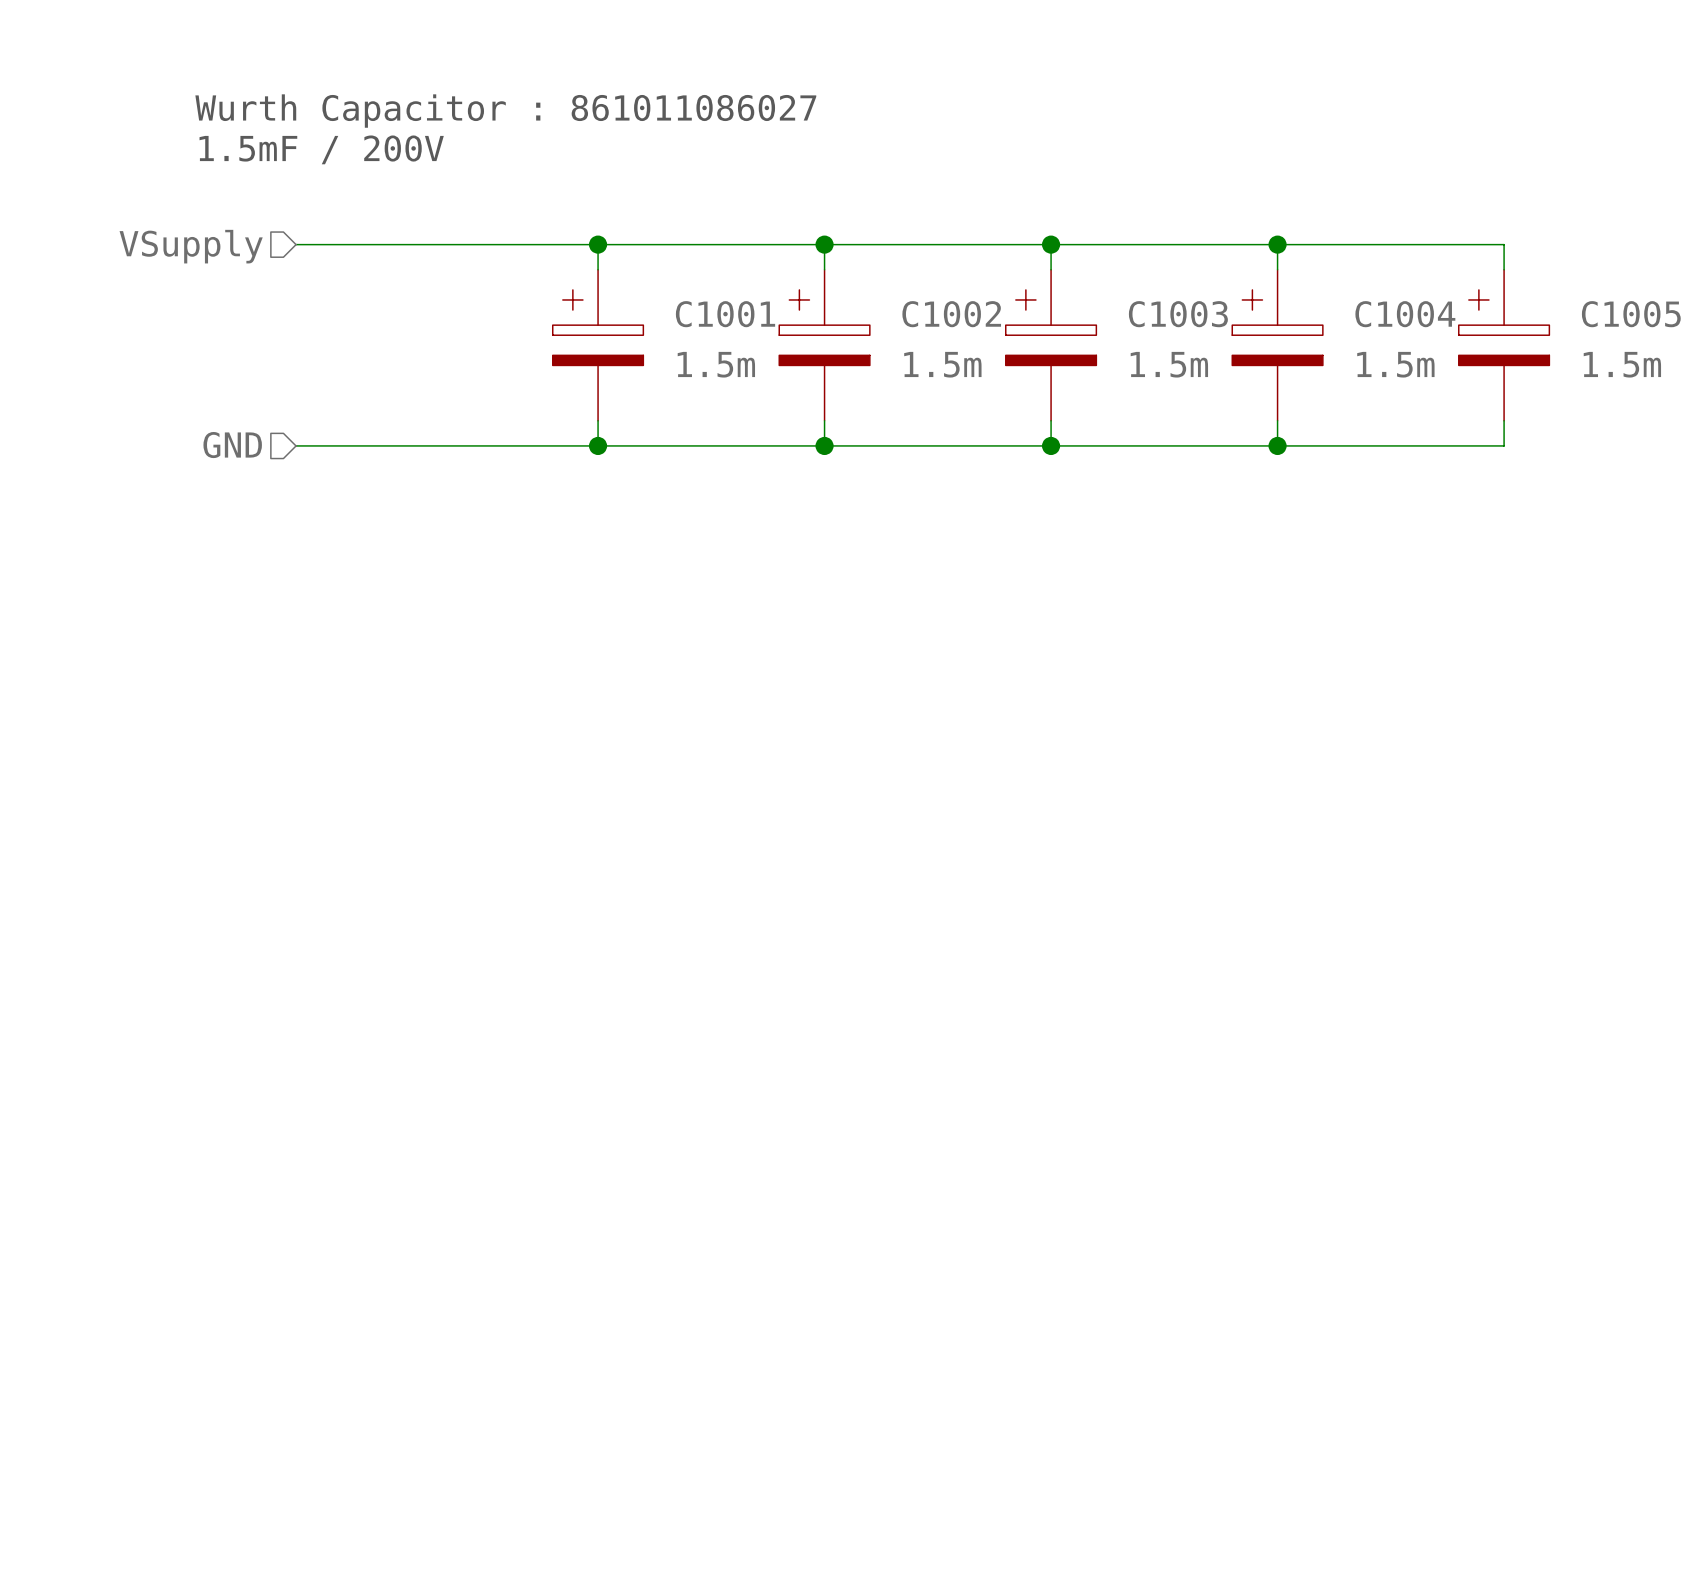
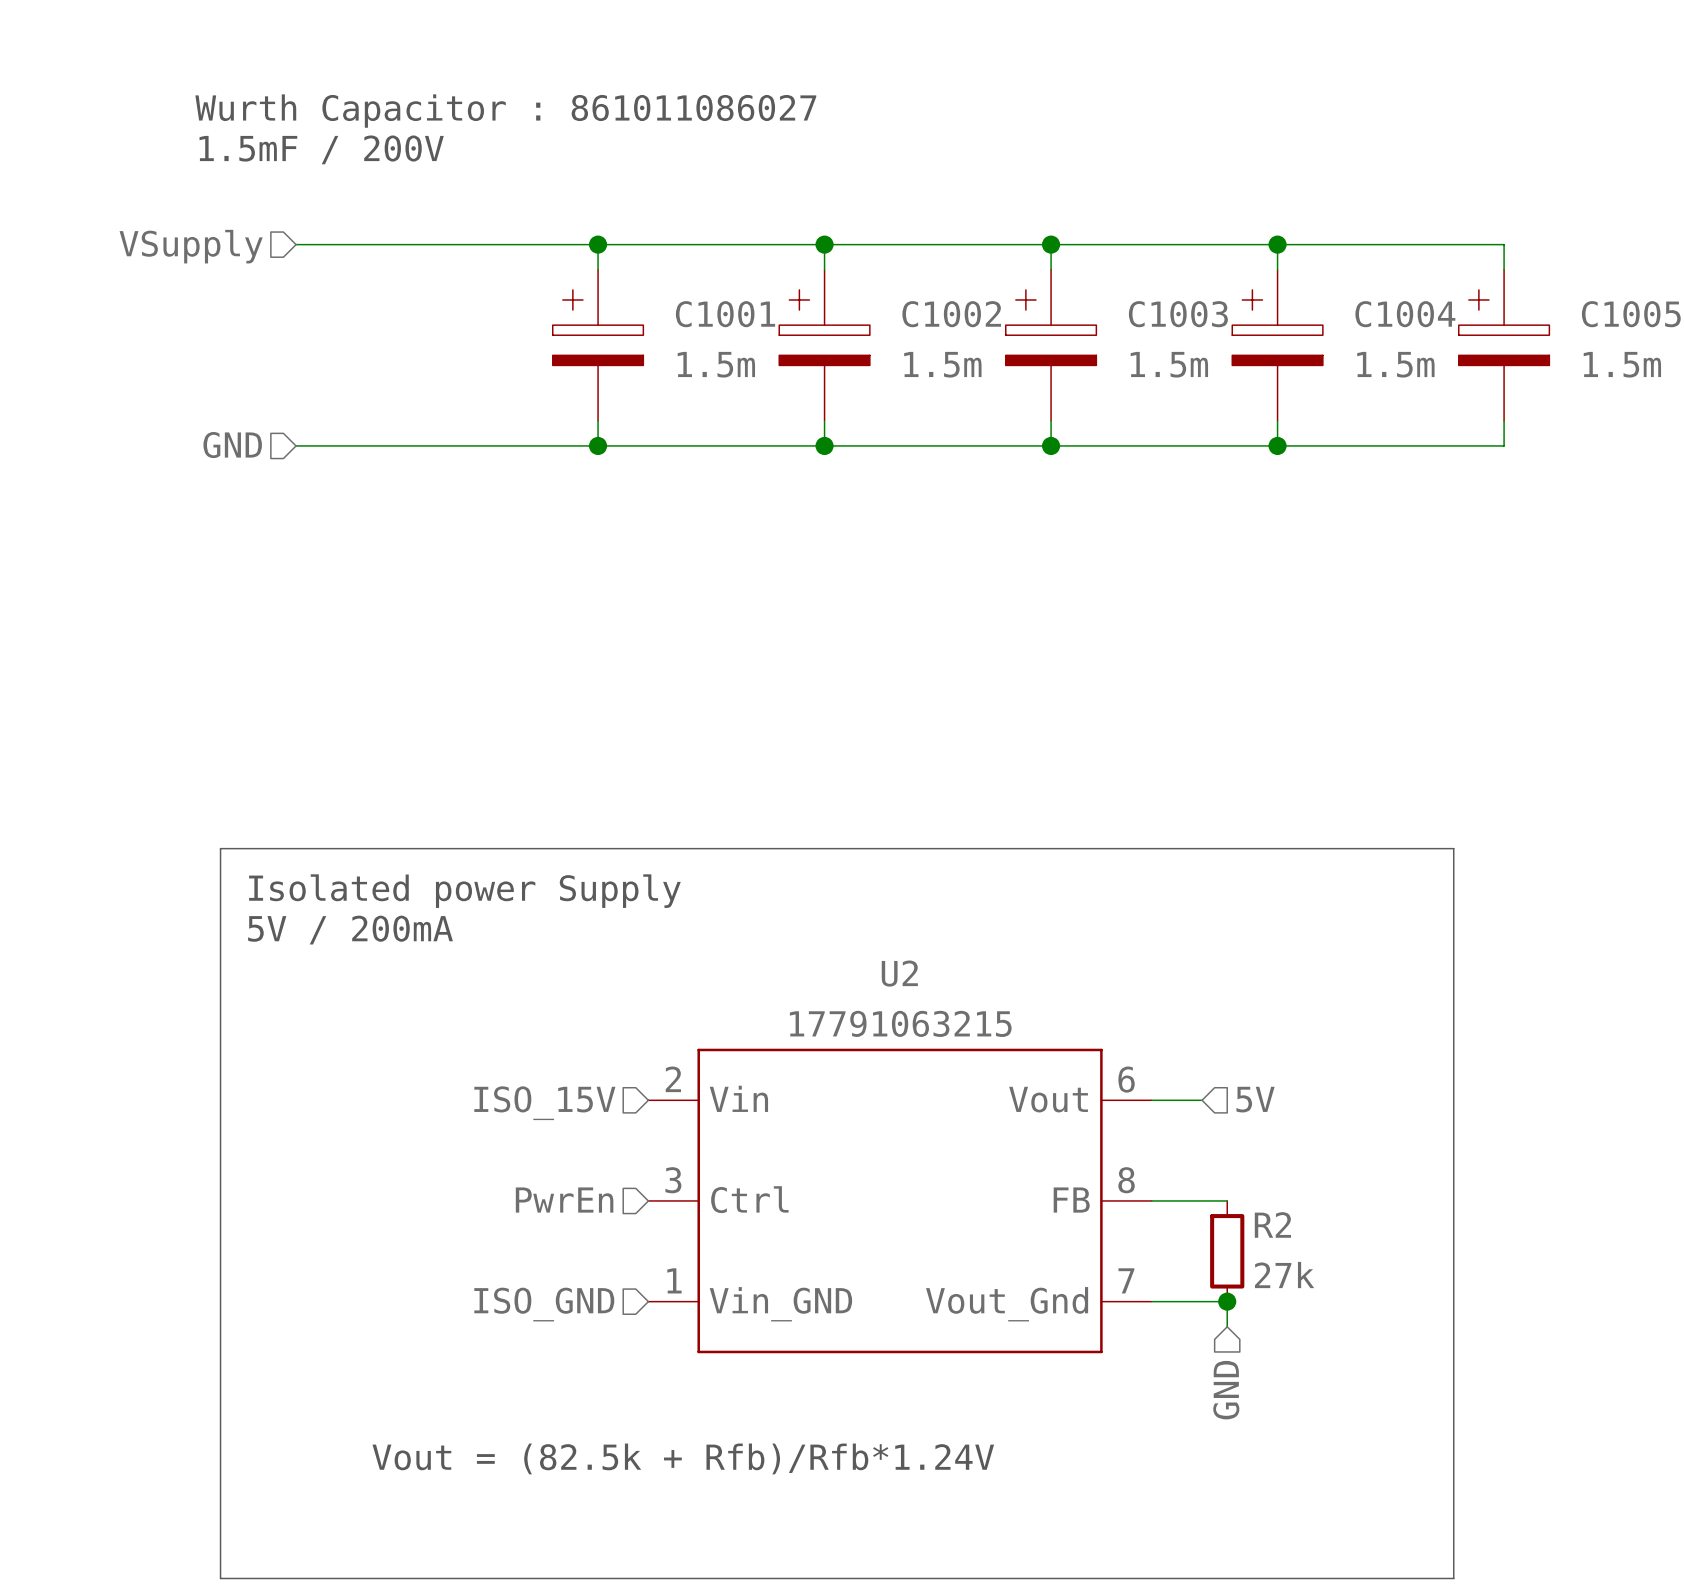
line: none -> (220, 848) (1453, 848) (1453, 1578) (220, 1578) (220, 848)
text: none -> Isolated power Supply (464, 891)
text: none -> 5V / 200mA (350, 930)
hierarchical label: none -> 5V (1255, 1099)
wire: none -> (1151, 1100) (1202, 1100)
hierarchical label: none -> ISO_15V (544, 1103)
hierarchical label: none -> PwrEn (564, 1200)
U2: none -> 17791063215 (900, 1200)
wire: none -> (1151, 1200) (1227, 1200)
R2: none -> 27k (1227, 1251)
wire: none -> (1151, 1301) (1227, 1301) (1227, 1326)
junction: none -> (1227, 1301)
hierarchical label: none -> ISO_GND (544, 1304)
hierarchical label: none -> GND (1226, 1390)
text: none -> Vout = (82.5k + Rfb)/Rfb*1.24V (683, 1458)

